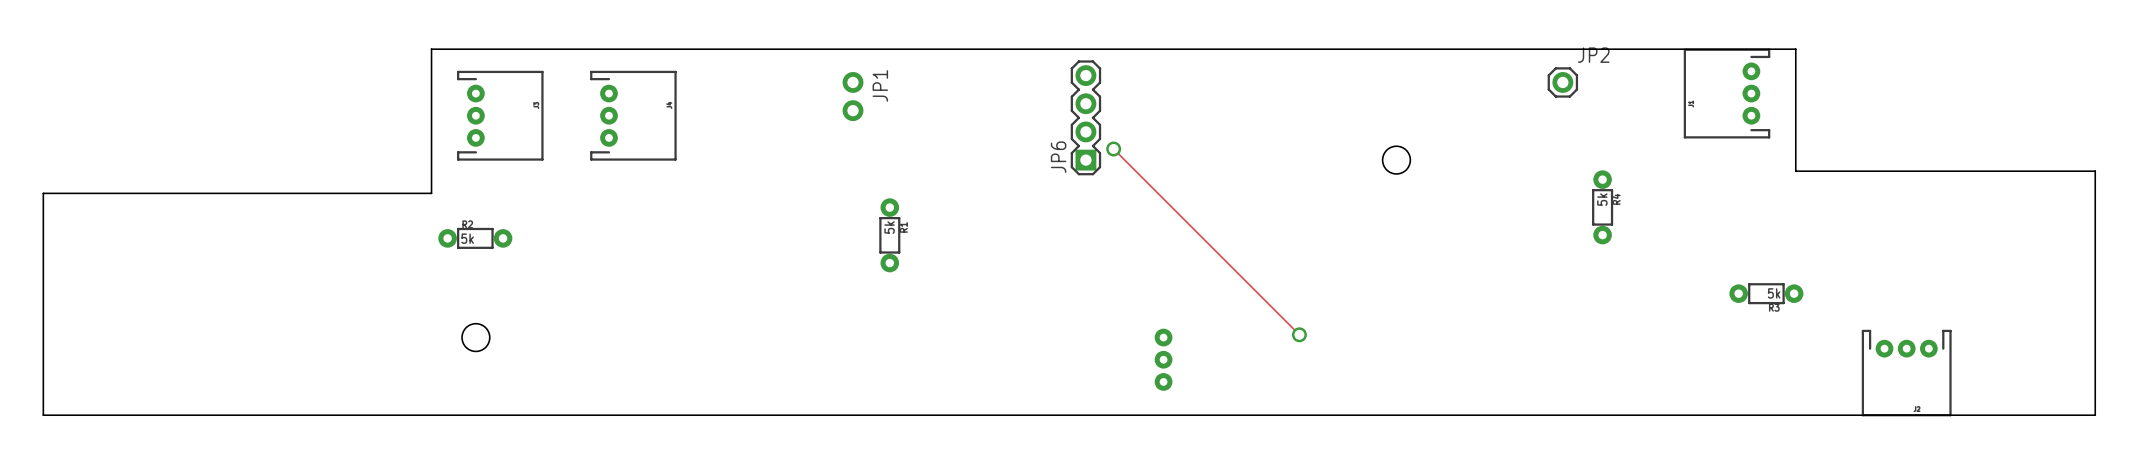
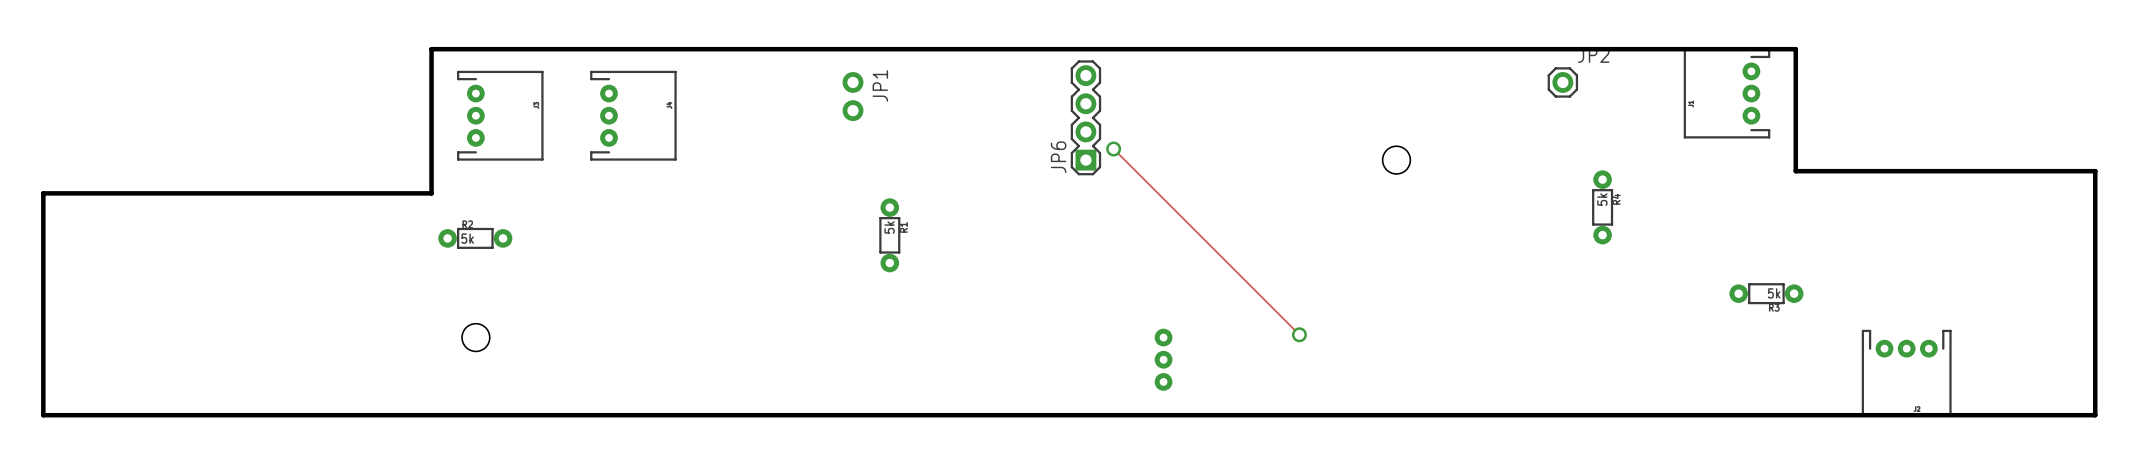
board edge: none -> (431, 49) (1795, 49) (1795, 171) (2095, 171) (2095, 415) (43, 415) (43, 193) (431, 193) (431, 49)

